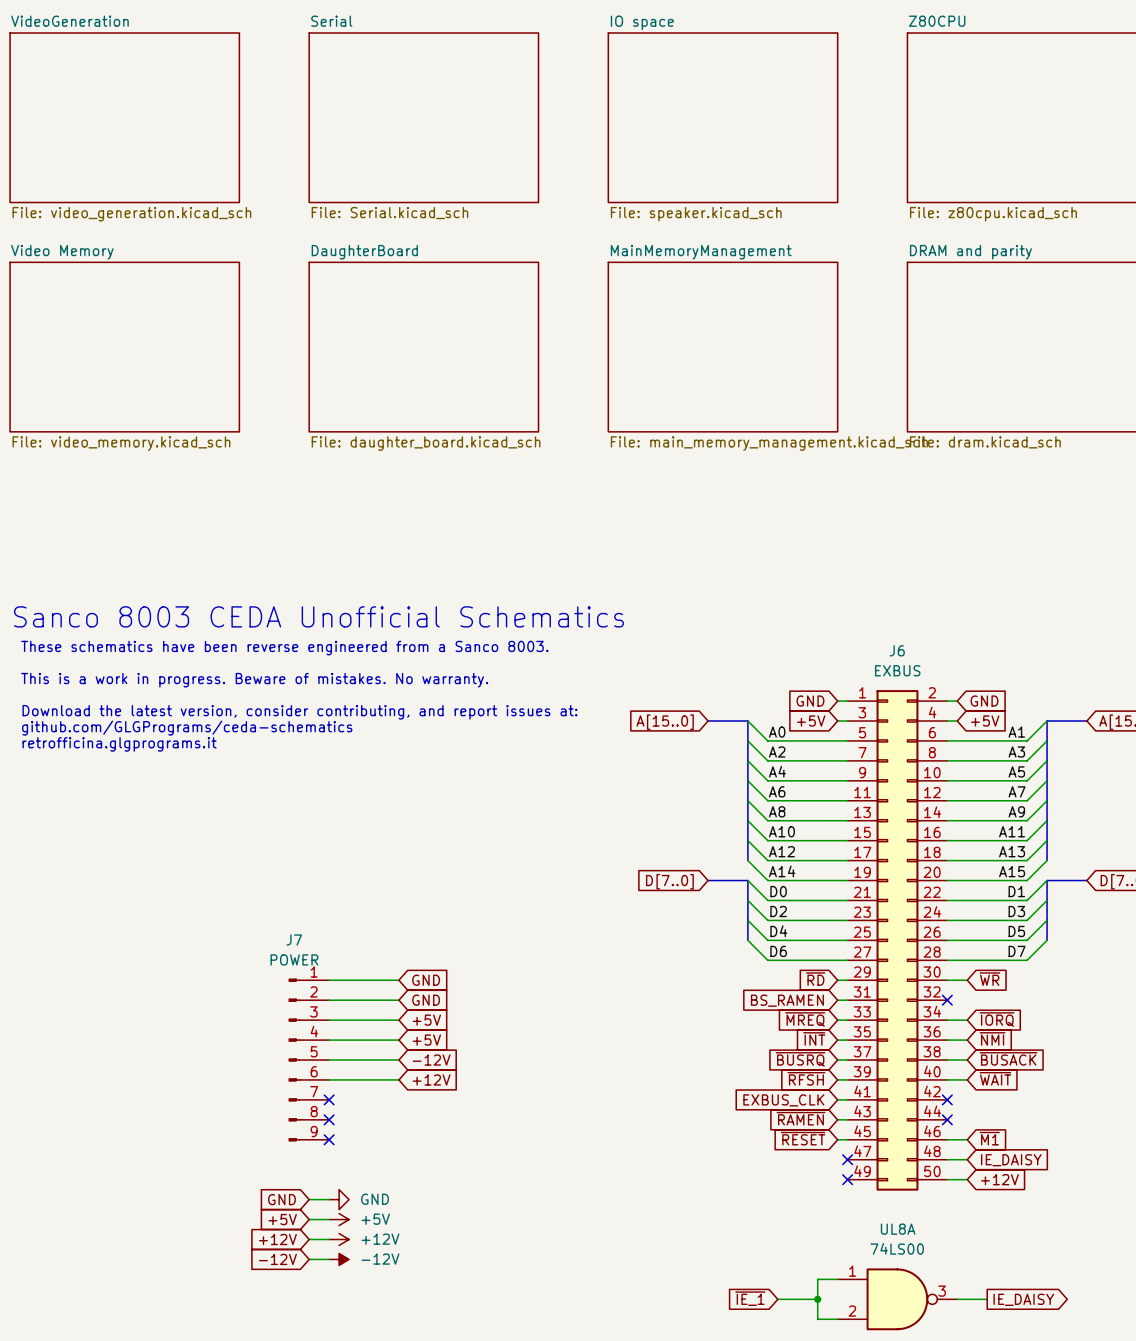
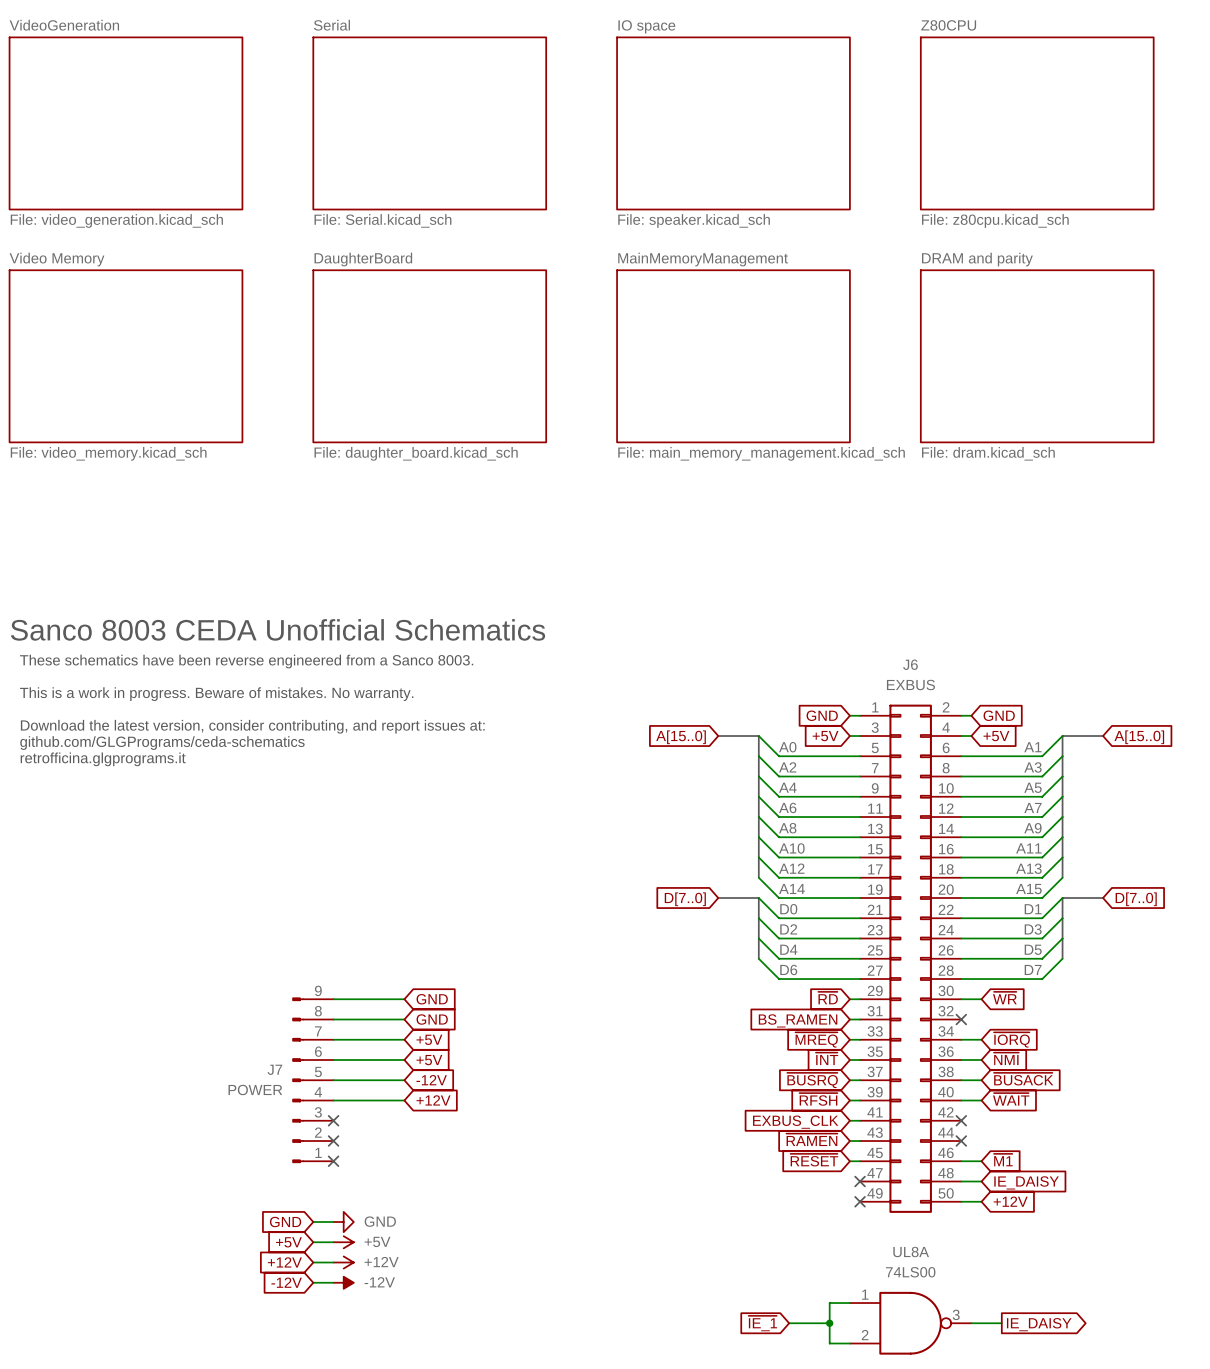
J7 name position: J7 (294, 940) -> J7 (274, 1069)
J7 value position: POWER (294, 959) -> POWER (255, 1090)
J7 flip: as is (294, 1060) -> up-down (298, 1080)

